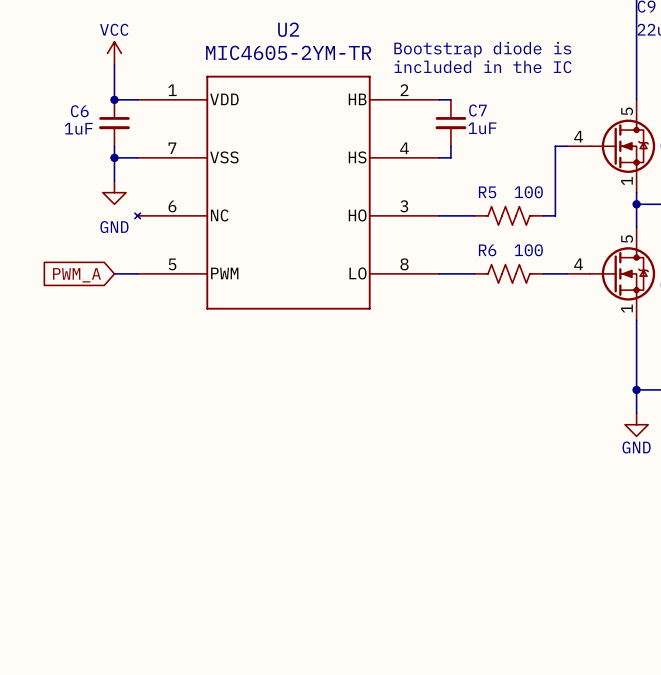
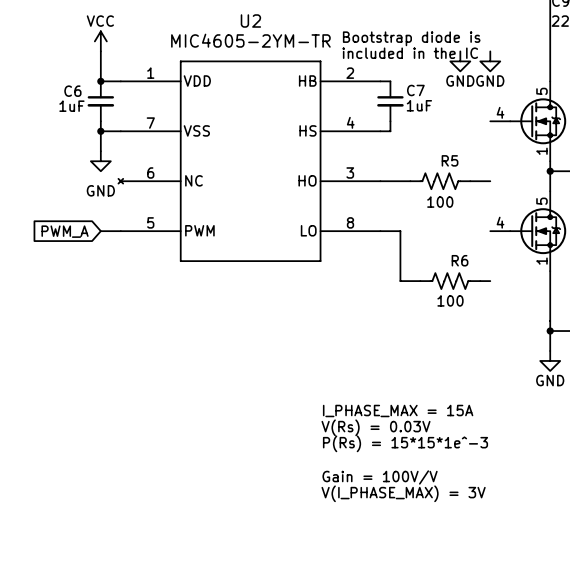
power symbol: none -> GND (460, 61)
power symbol: none -> GND (490, 61)
wire: (566, 146) (555, 146) (555, 215) -> (490, 181) (480, 181)
R5 name position: R5 (487, 192) -> R5 (450, 160)
R5 value position: 100 (528, 192) -> 100 (440, 202)
R6 name position: R6 (487, 250) -> R6 (460, 260)
R6 value position: 100 (528, 250) -> 100 (450, 300)
wire: (462, 273) (474, 273) -> (400, 231) (400, 281) (420, 281)
R6 position: (508, 273) -> (450, 281)
wire: (543, 273) (566, 273) -> none
wire: none -> (480, 281) (490, 281)
text: none -> I_PHASE_MAX = 15A (398, 410)
text: none -> V(Rs) = 0.03V (376, 427)
text: none -> P(Rs) = 15*15*1e^-3 (405, 443)
text: none -> Gain = 100V/V (380, 477)
text: none -> V(I_PHASE_MAX) = 3V (403, 493)

